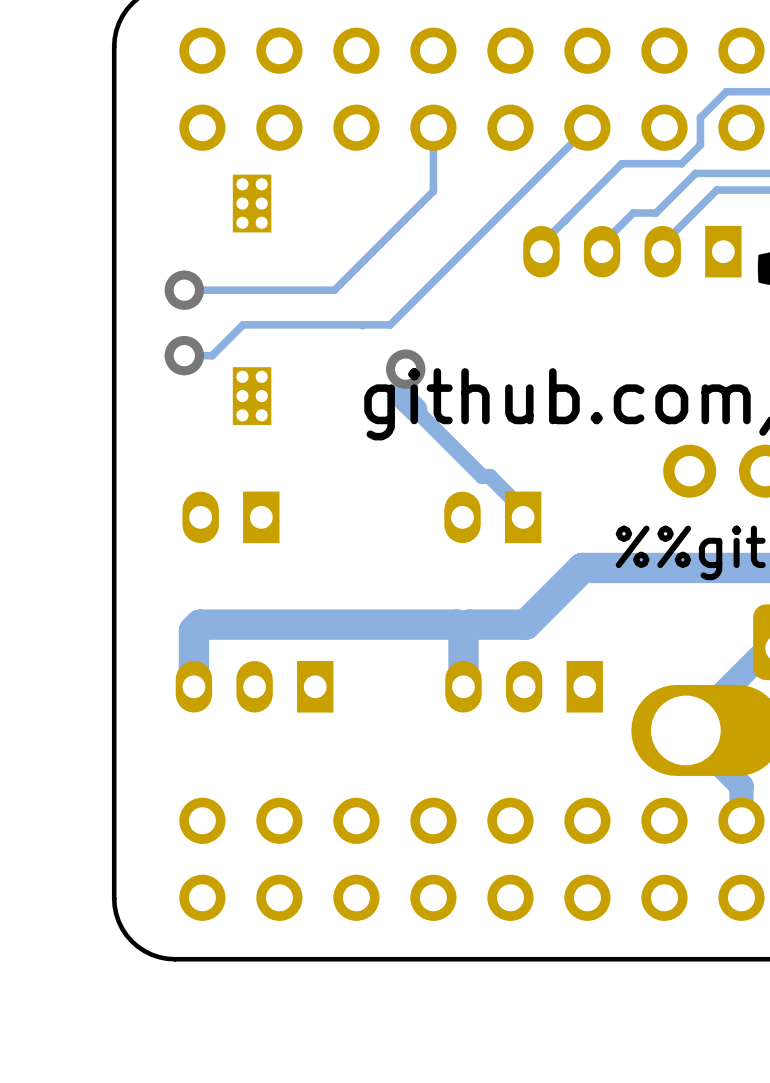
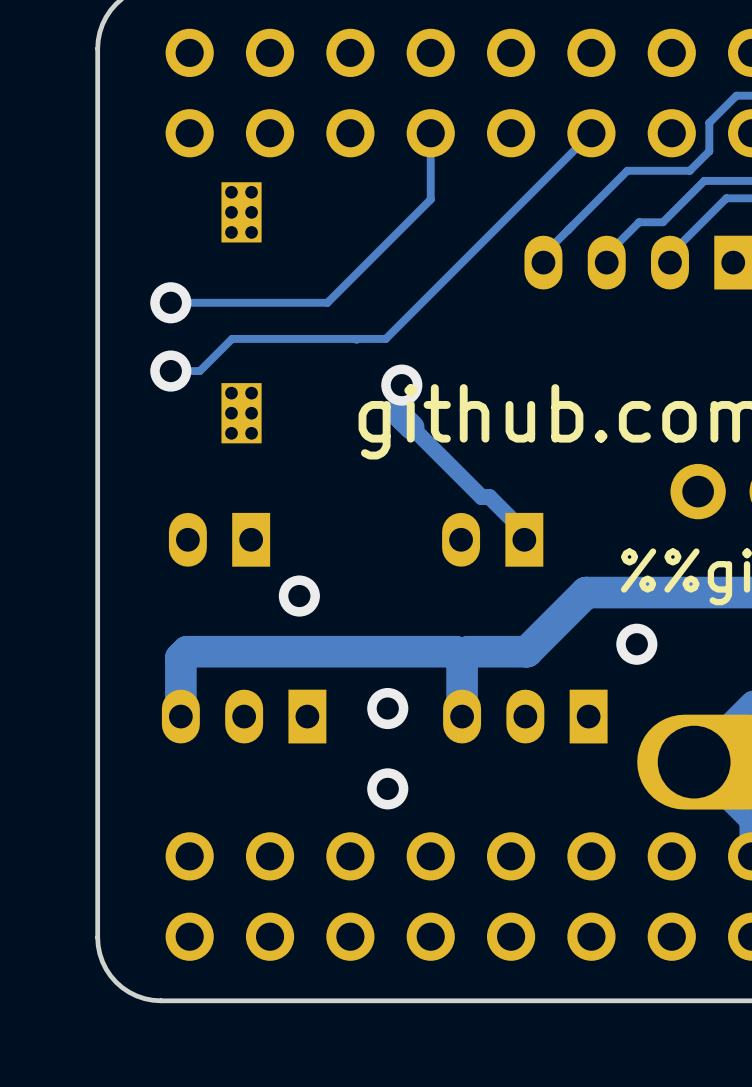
via: none -> (299, 596)
via: none -> (636, 644)
via: none -> (387, 708)
via: none -> (387, 788)

